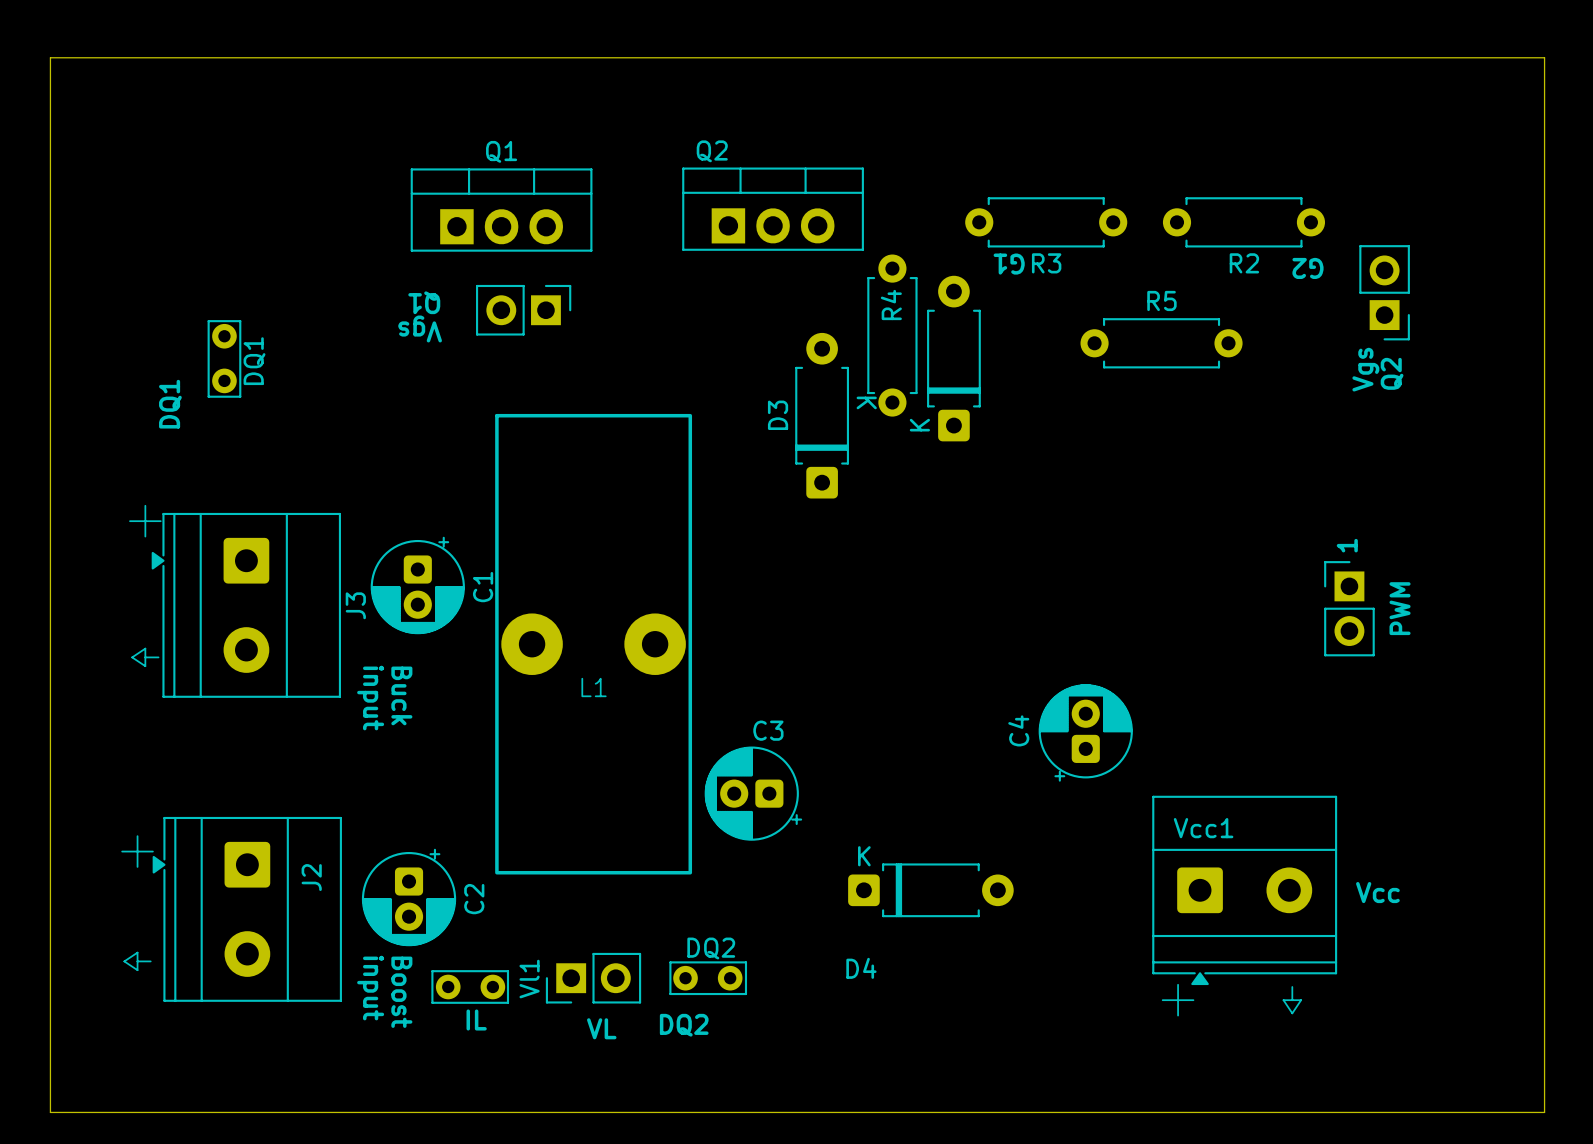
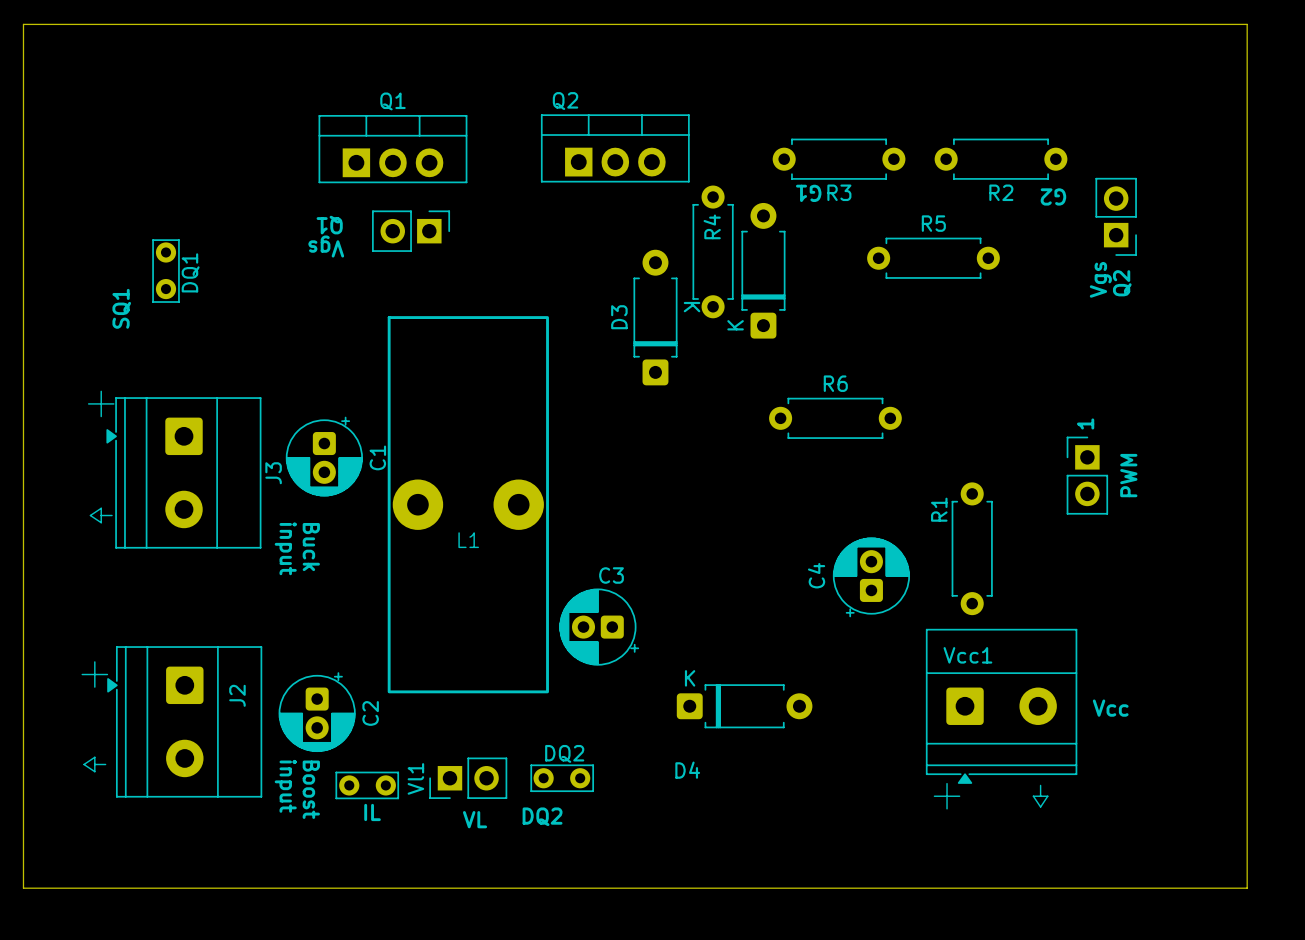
text: DQ1 (170, 404) -> SQ1 (121, 308)
R6: none -> (835, 418)
R1: none -> (972, 548)

